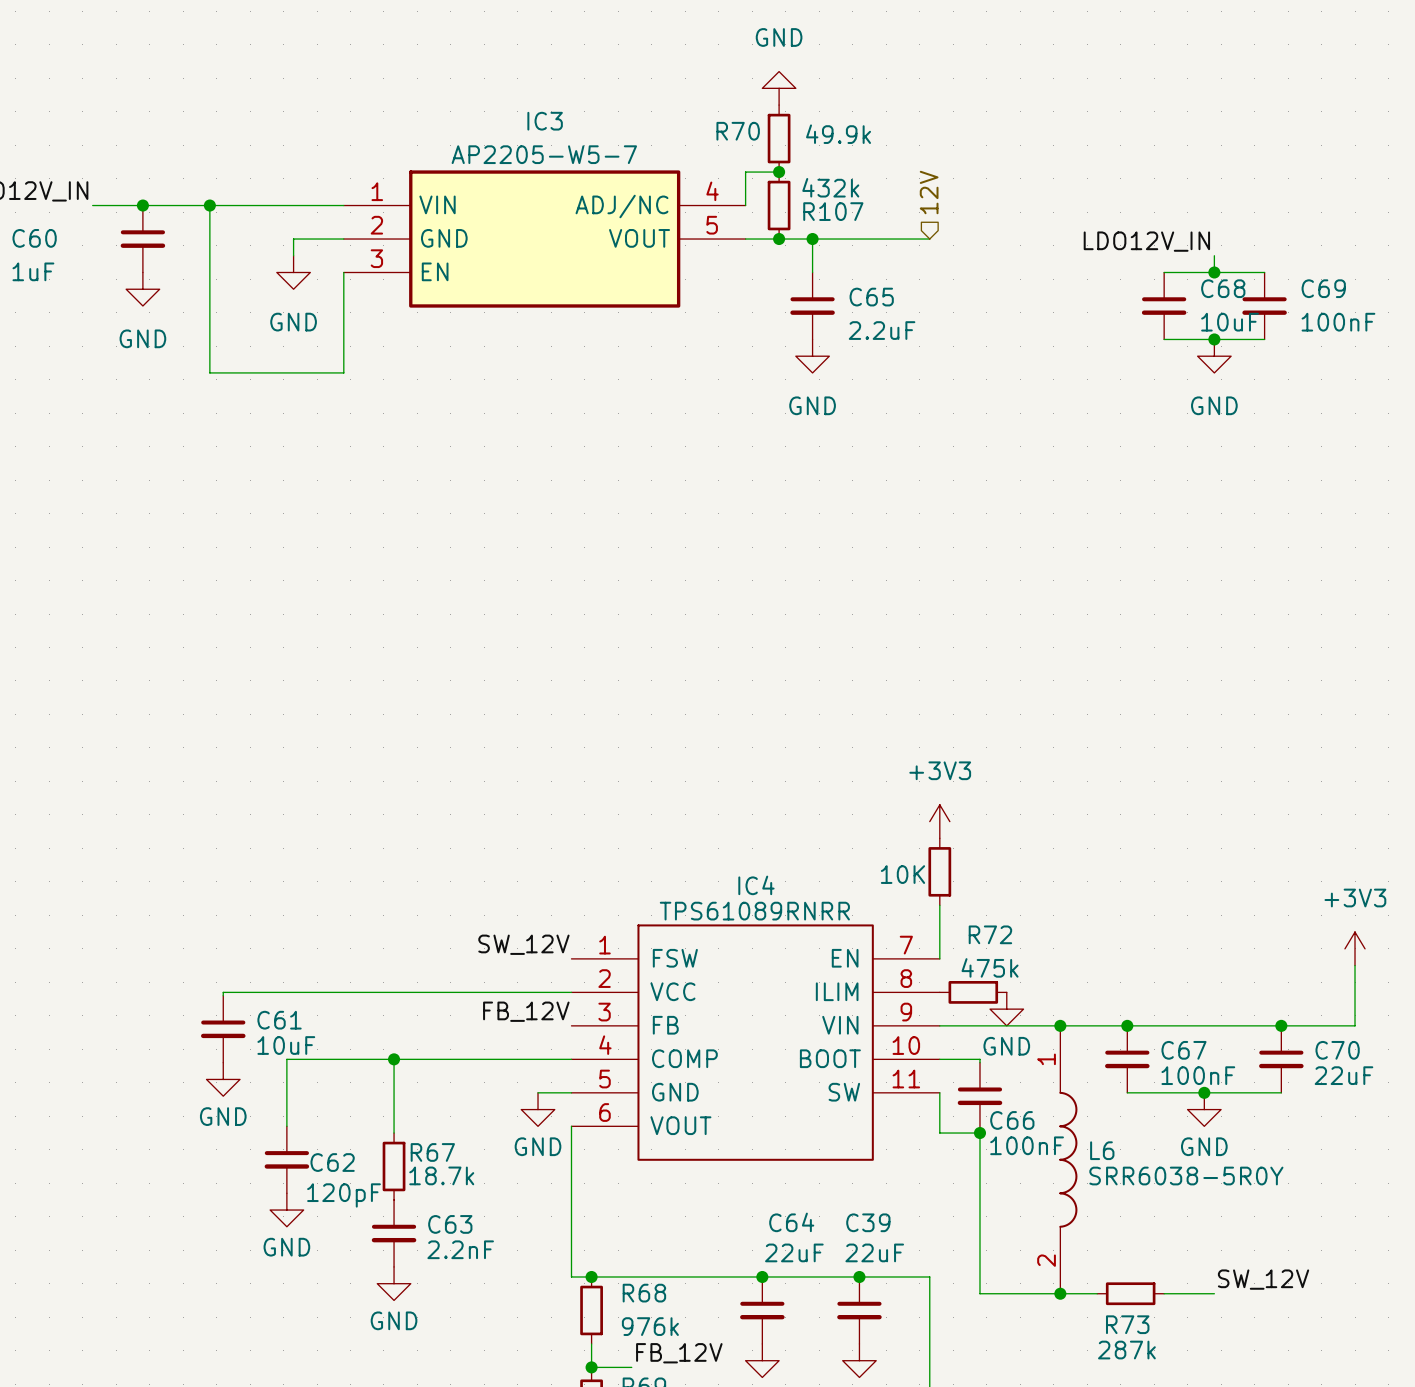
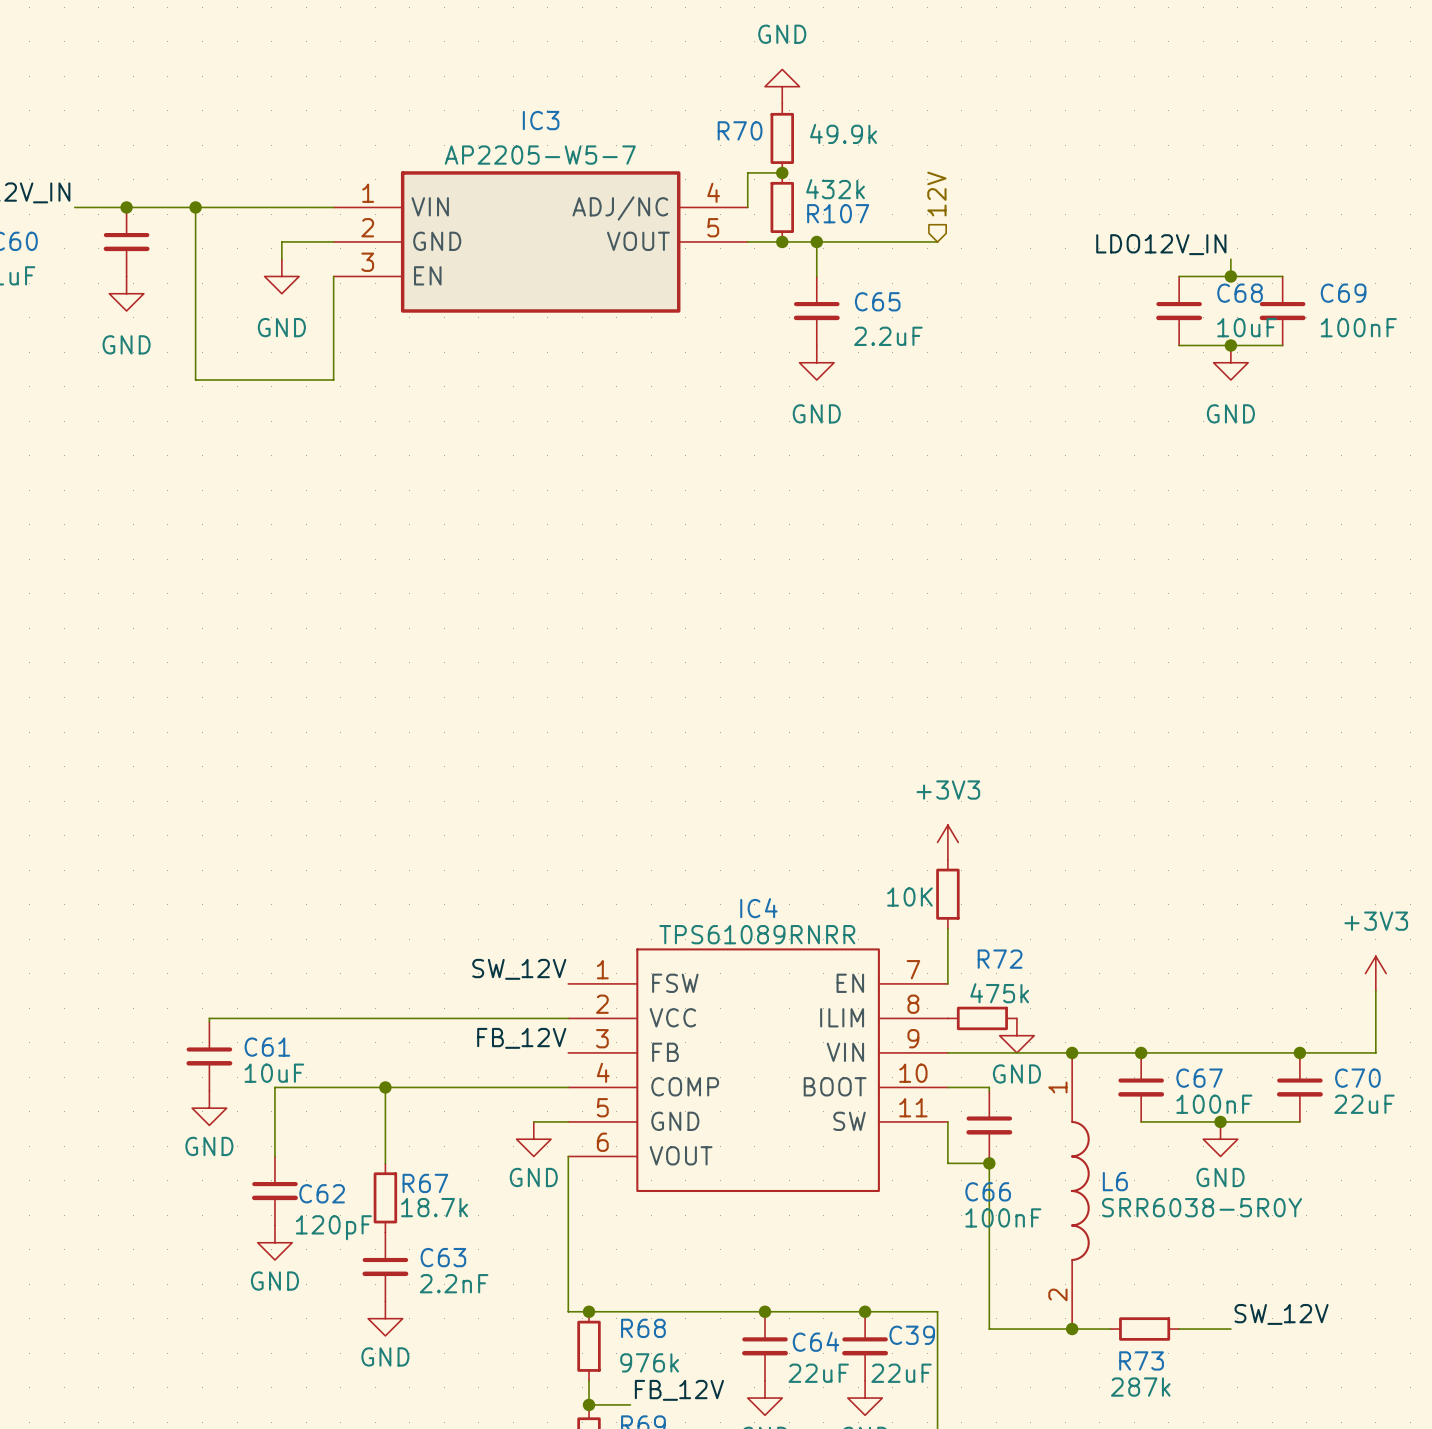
C66 name position: C66 (1012, 1120) -> C66 (988, 1191)
C66 value position: 100nF (1027, 1145) -> 100nF (1003, 1217)
C64 name position: C64 (791, 1222) -> C64 (815, 1341)
C39 name position: C39 (868, 1222) -> C39 (912, 1335)
C64 value position: 22uF (794, 1252) -> 22uF (818, 1373)
C39 value position: 22uF (874, 1252) -> 22uF (901, 1373)

